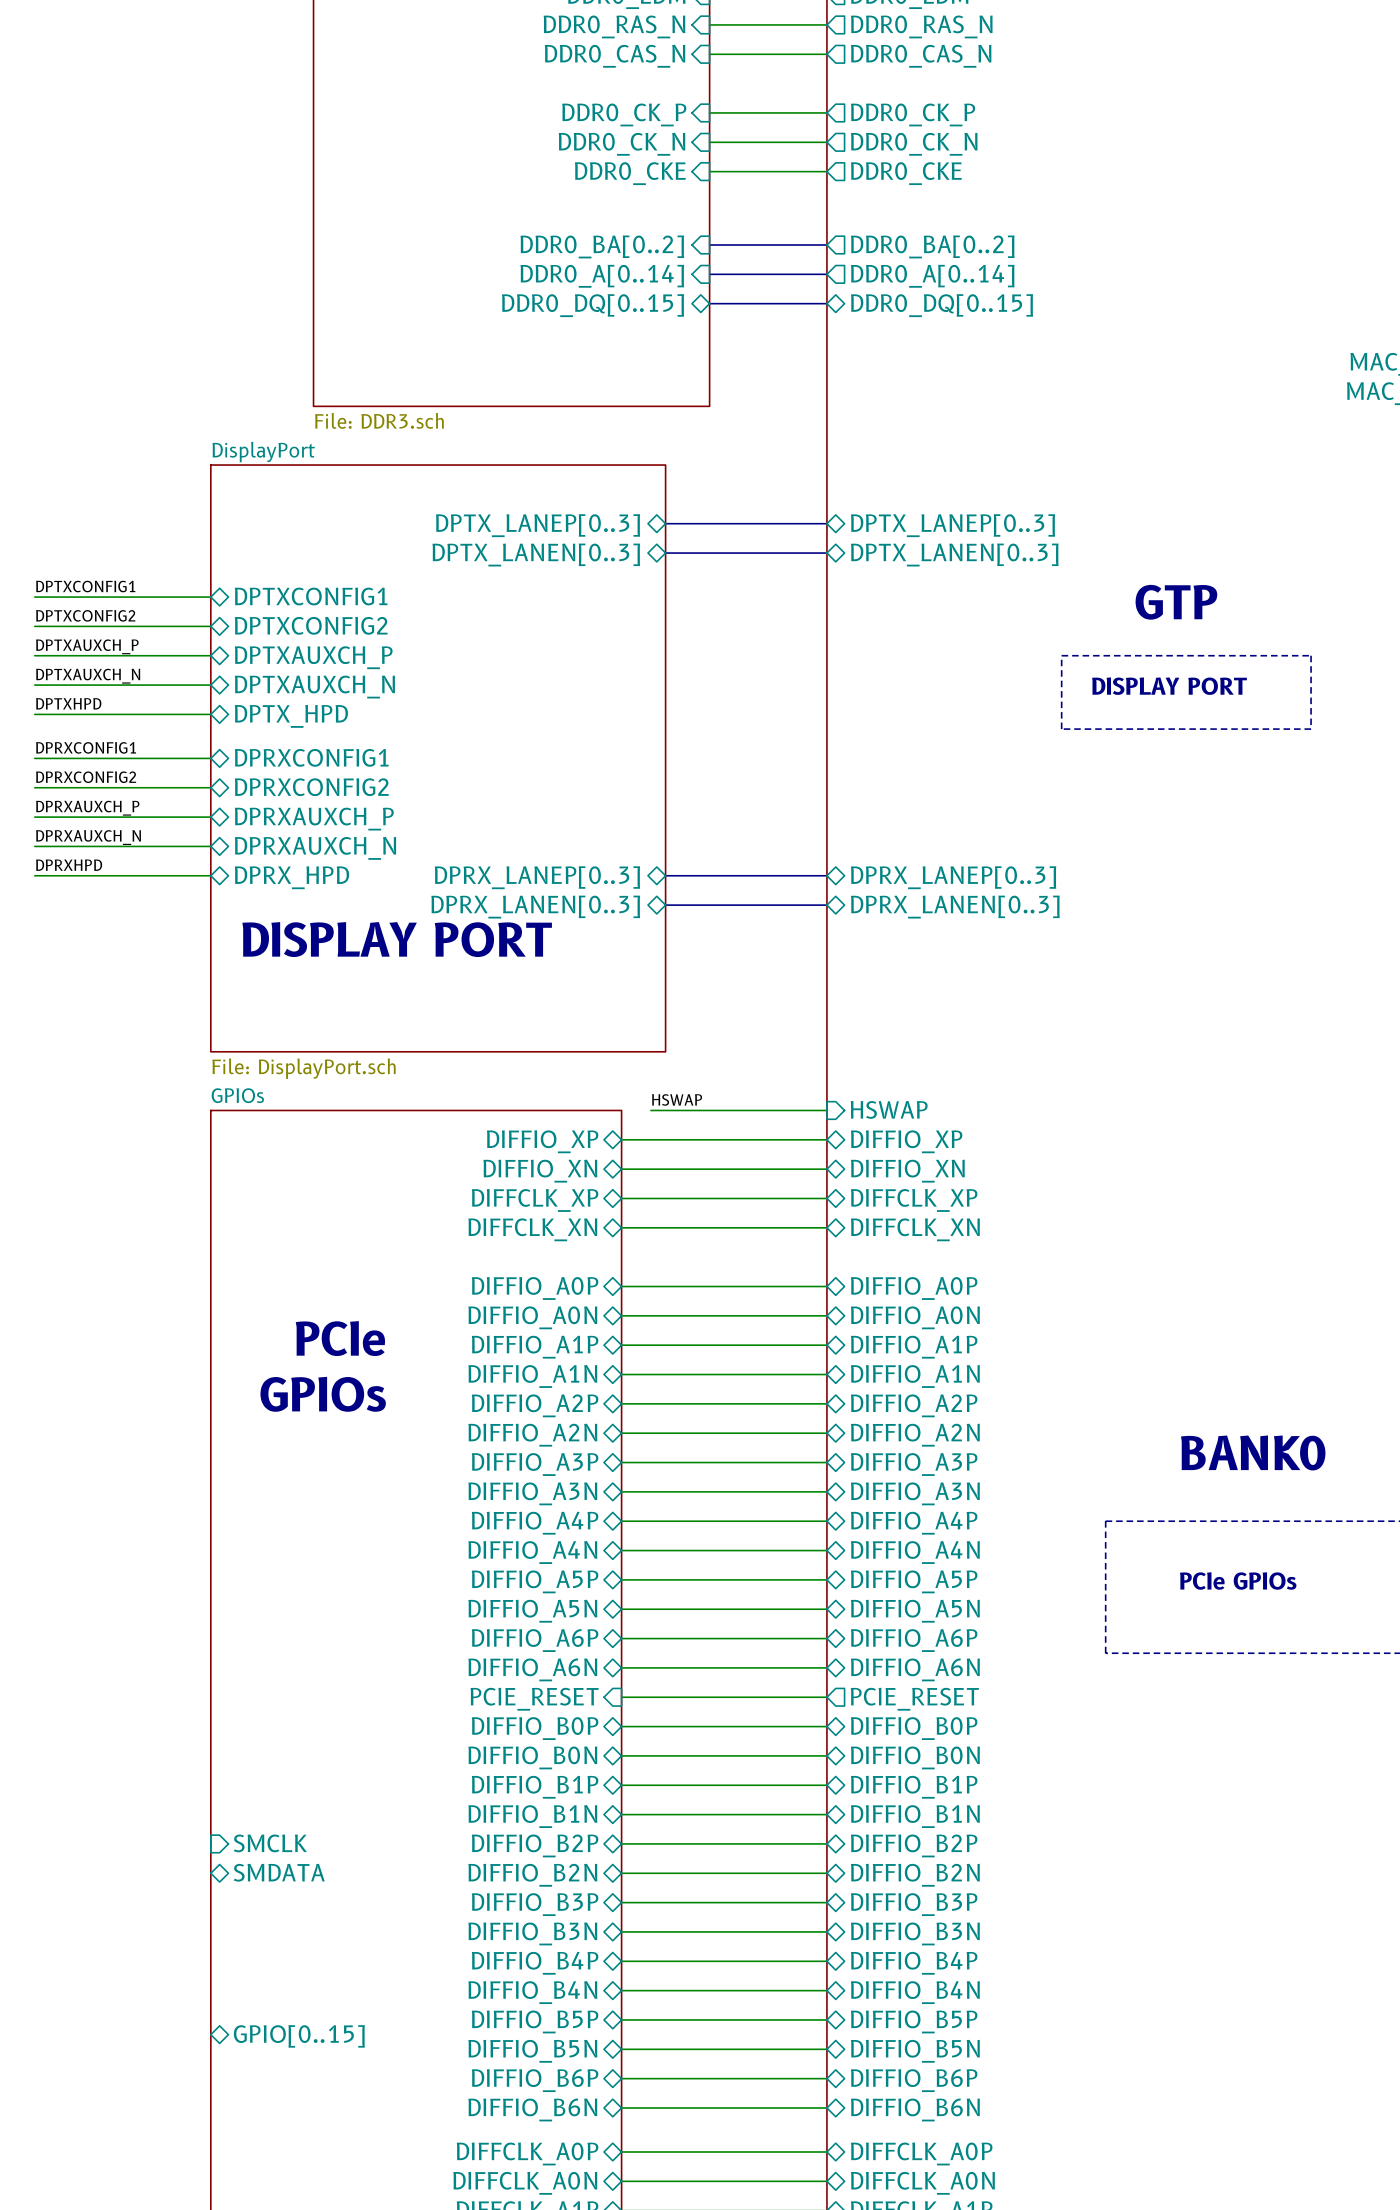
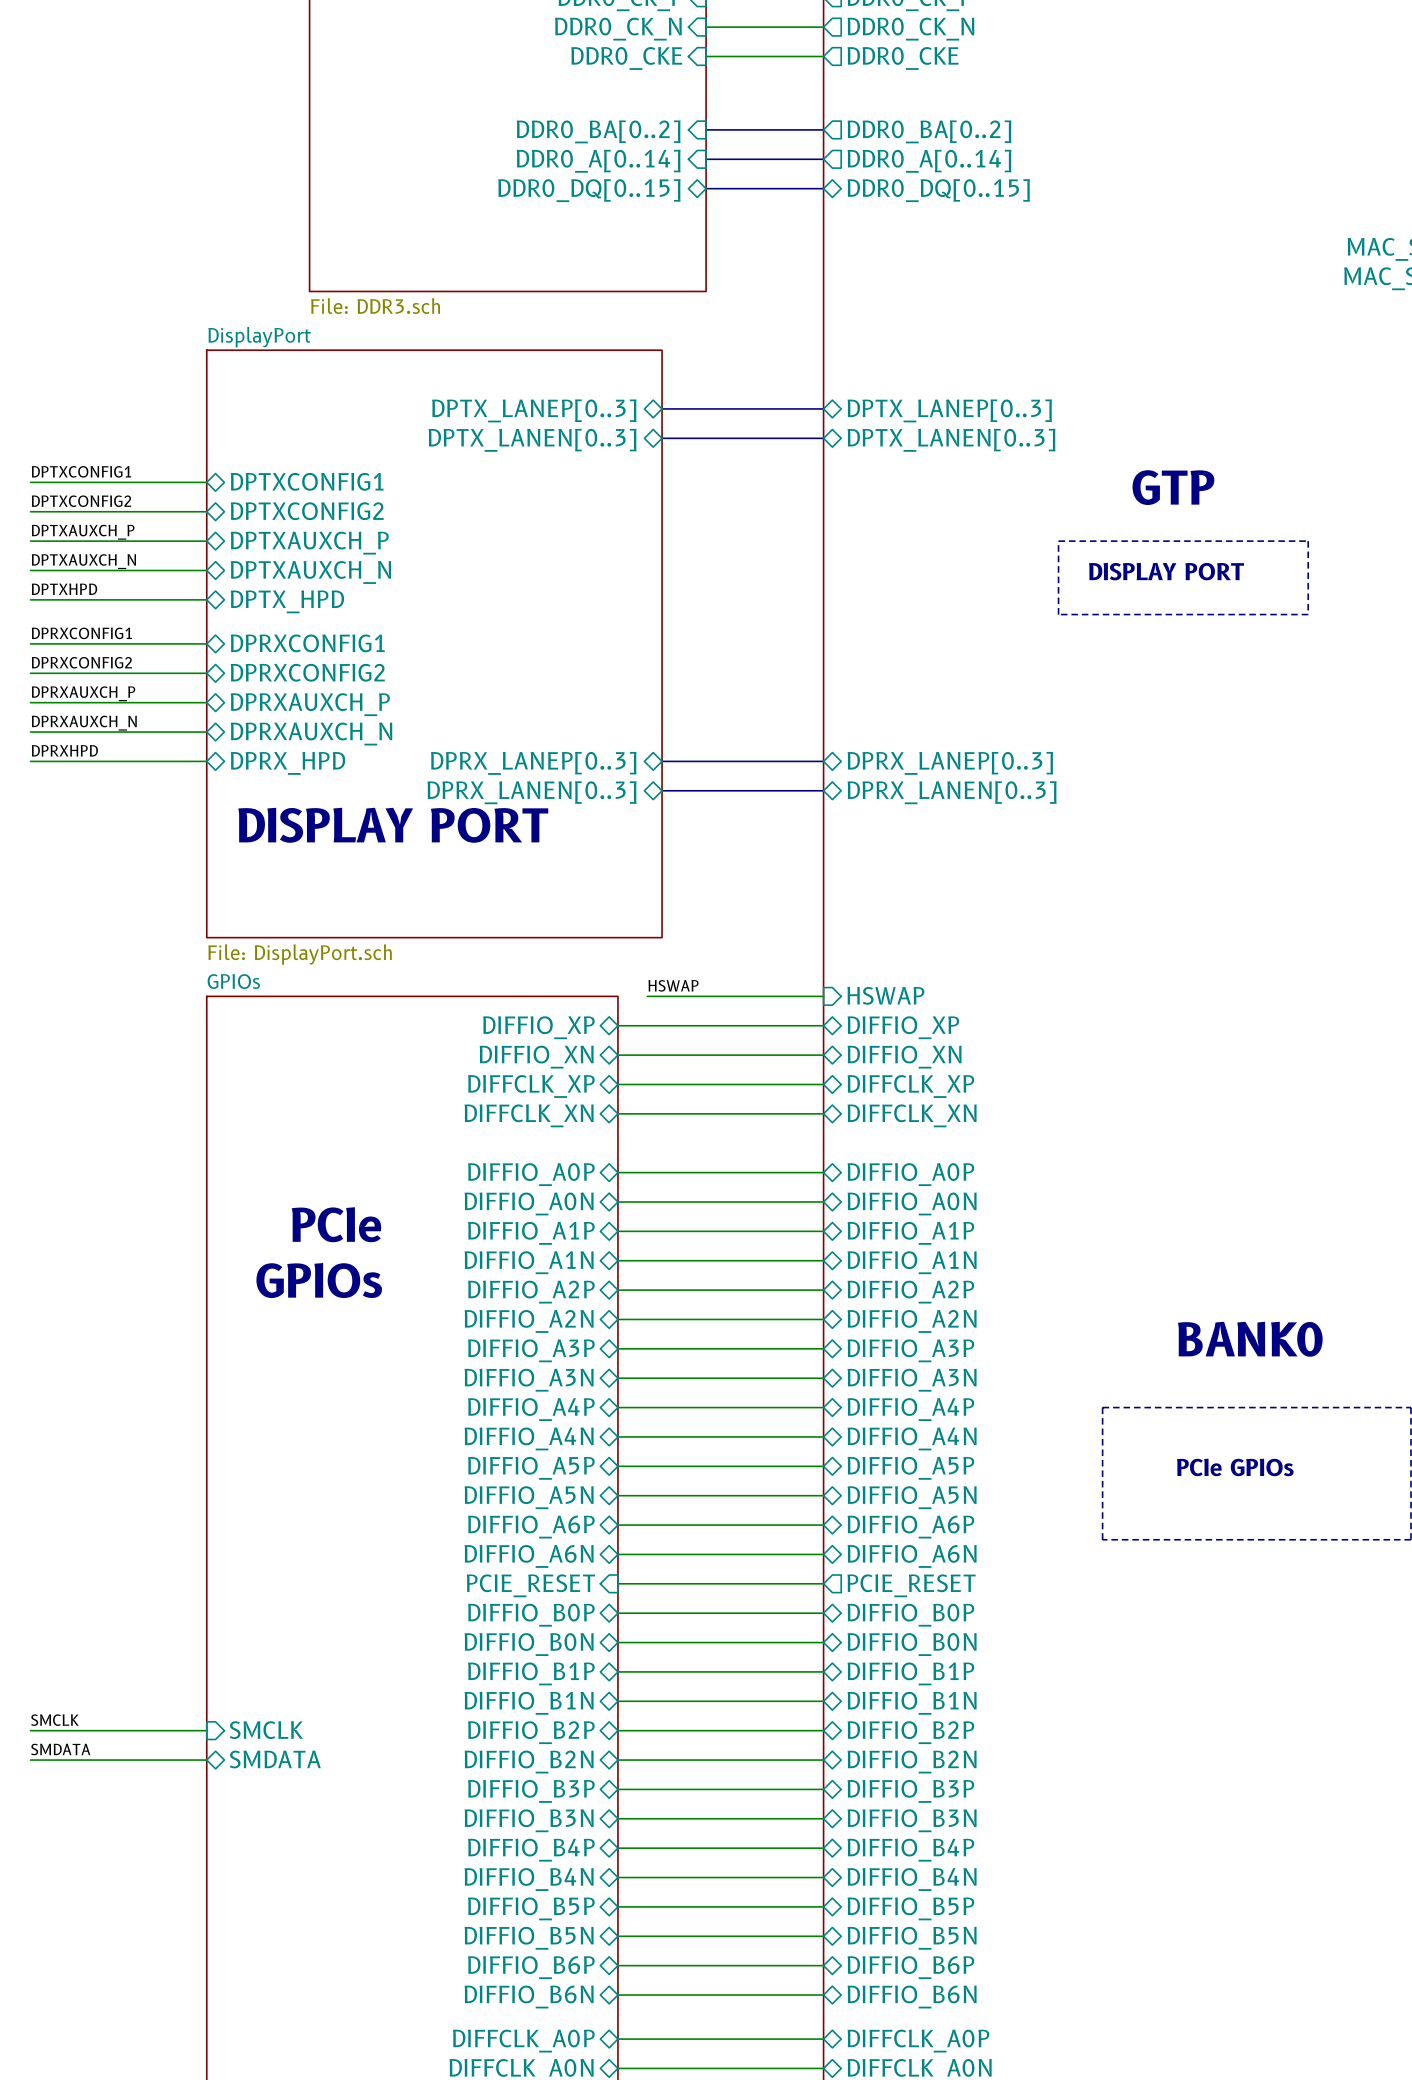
label: none -> SMCLK (54, 1720)
wire: none -> (30, 1730) (206, 1730)
label: none -> SMDATA (60, 1749)
wire: none -> (30, 1760) (206, 1760)
sheet pin: GPIO[0..15] (299, 2036) -> none

